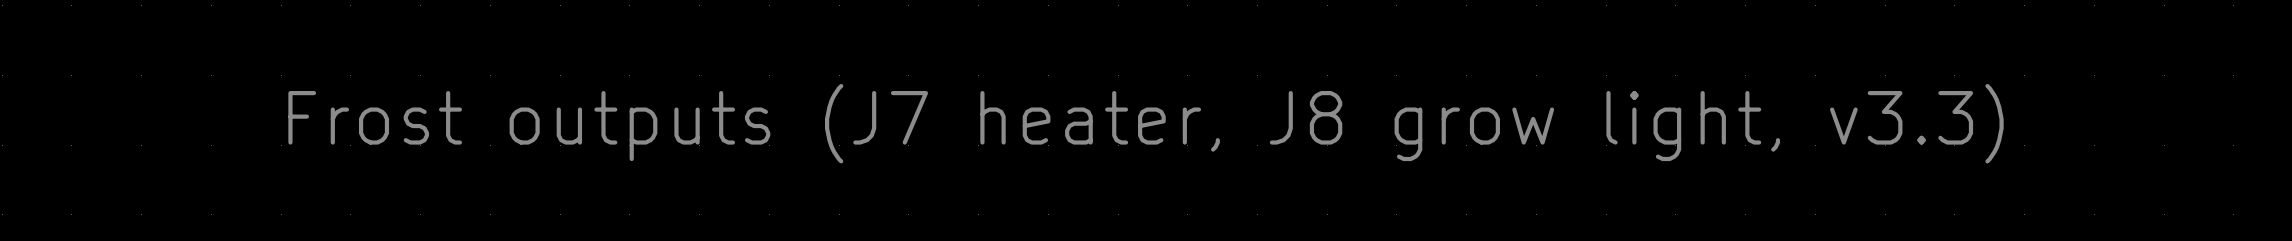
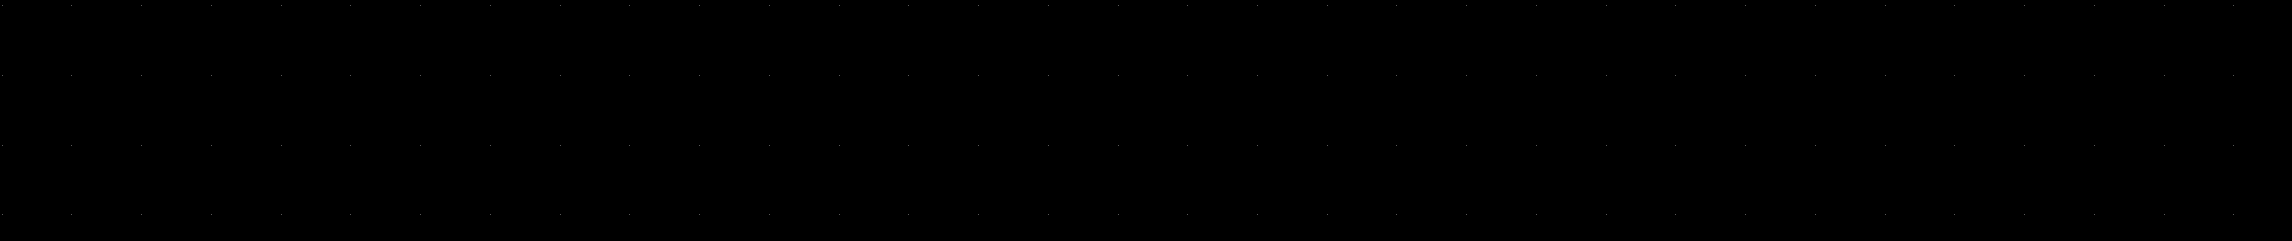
text: Frost outputs (J7 heater, J8 grow light, v3.3) (1146, 123) -> none

